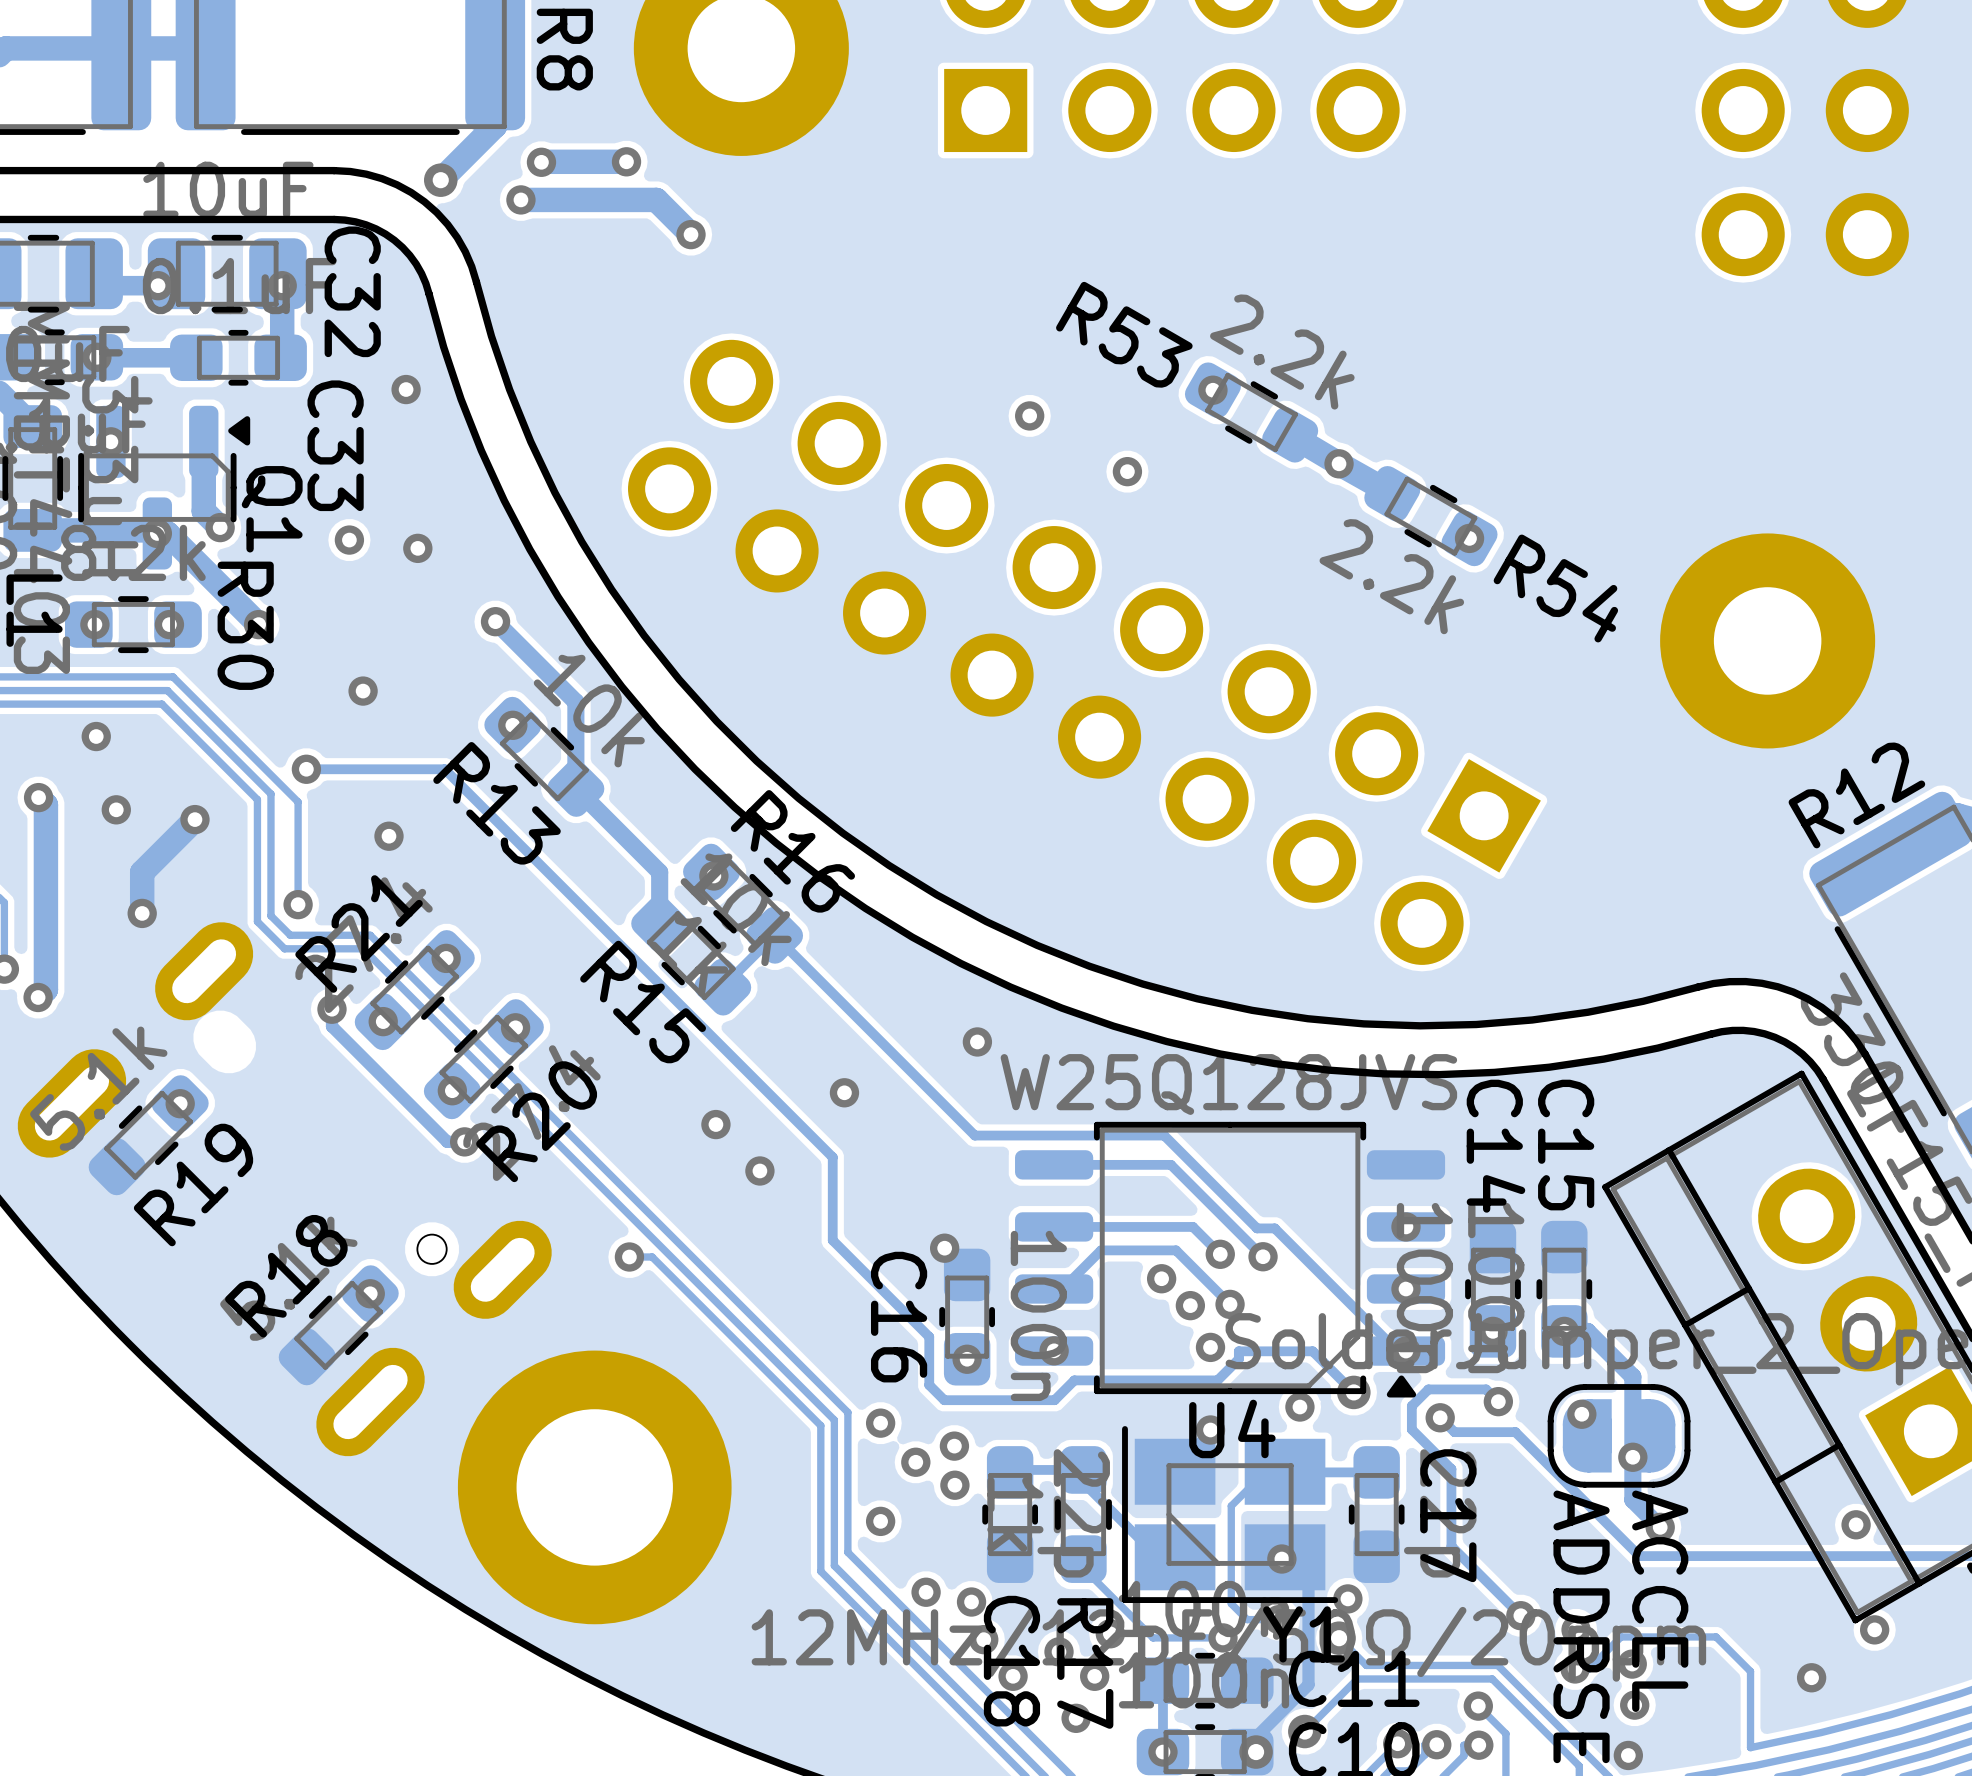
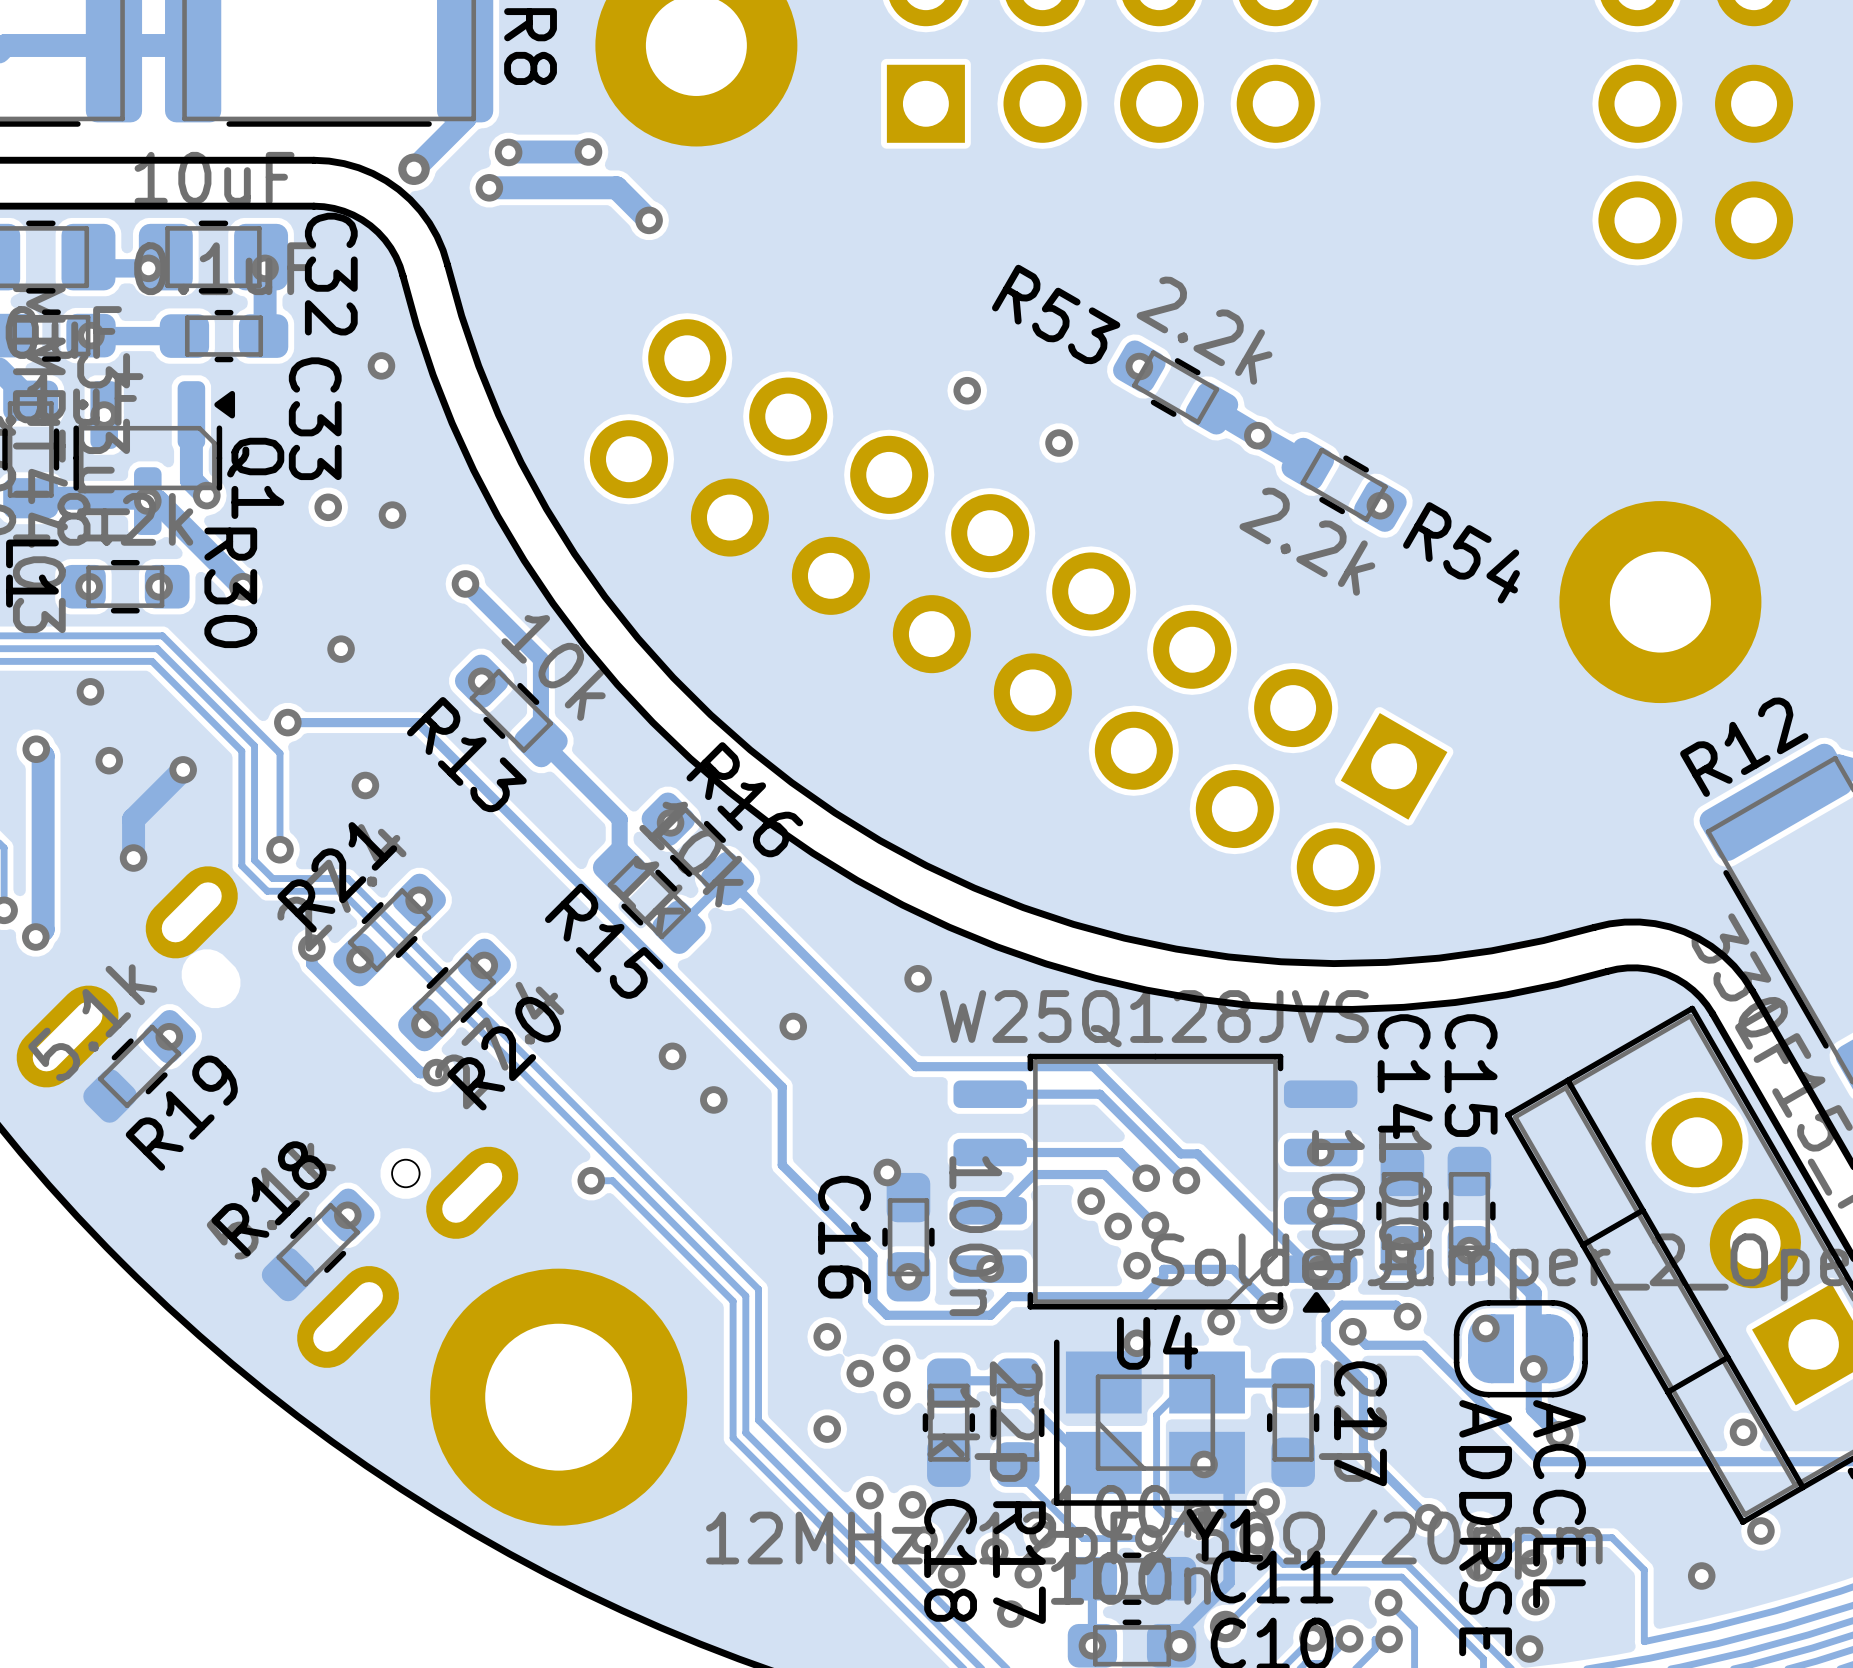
track: (505, 1069) (847, 1412) (847, 1552) -> (474, 1004) (758, 1289) (758, 1420) (796, 1458)
track: (793, 1379) (834, 1420) (834, 1565) -> (745, 1295) (745, 1432) (783, 1470)
track: (780, 1385) (820, 1425) (820, 1571) -> (733, 1301) (733, 1438) (771, 1476)

